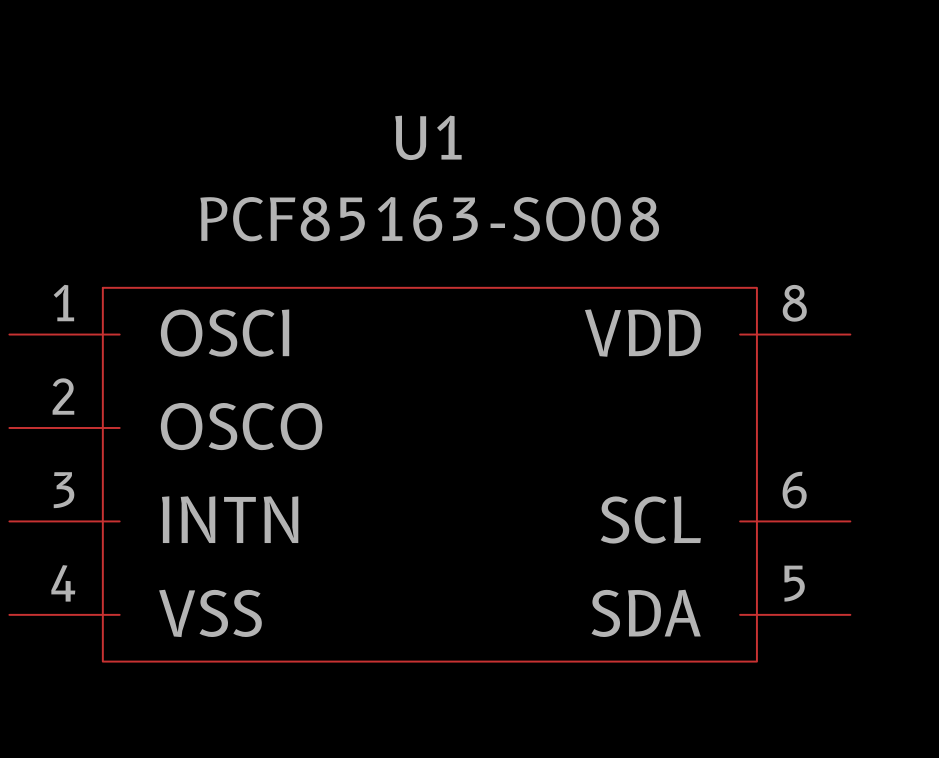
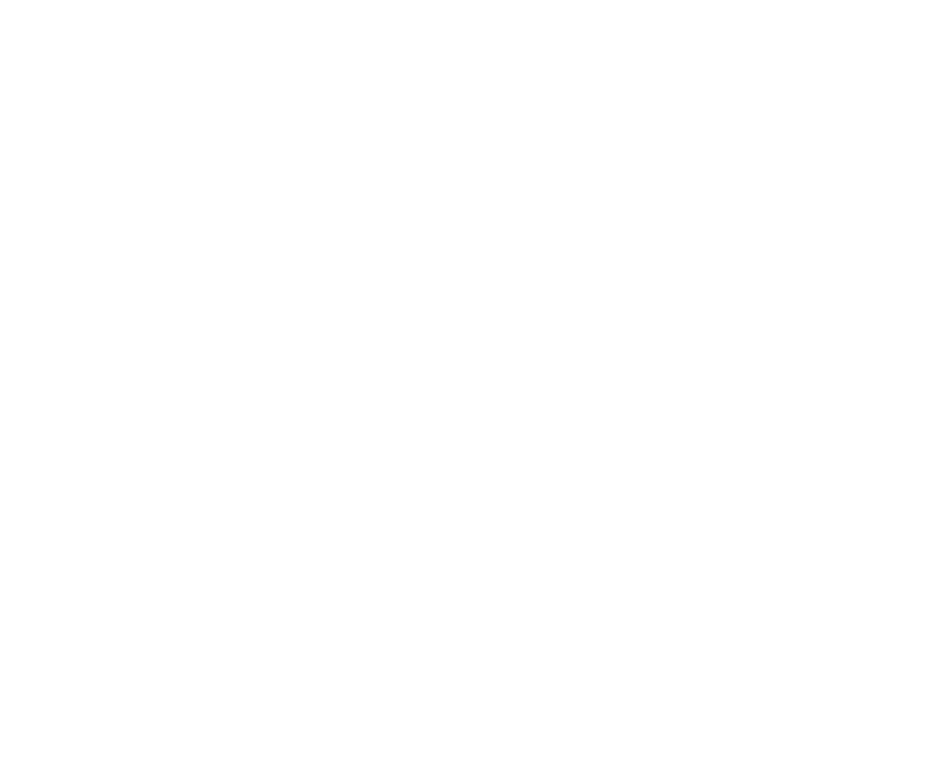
U1: PCF85163-SO08 (429, 474) -> none

